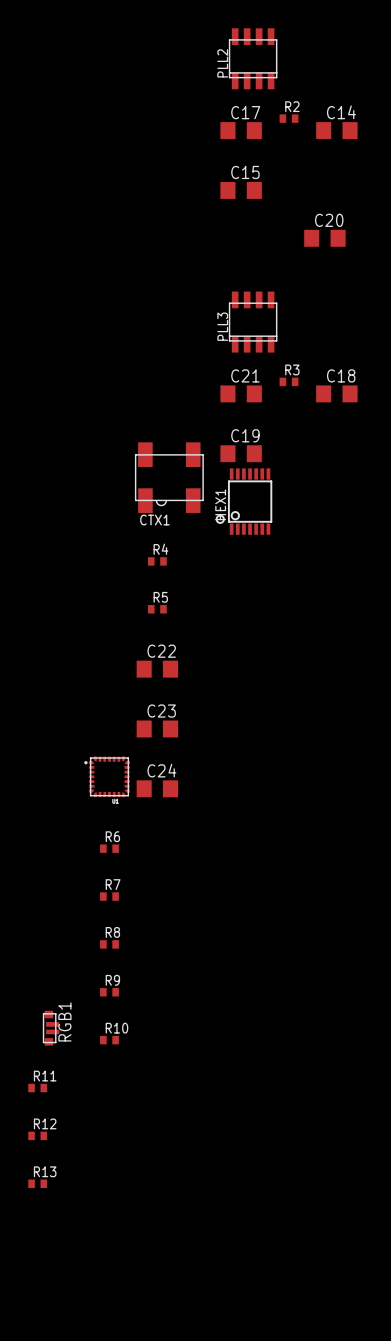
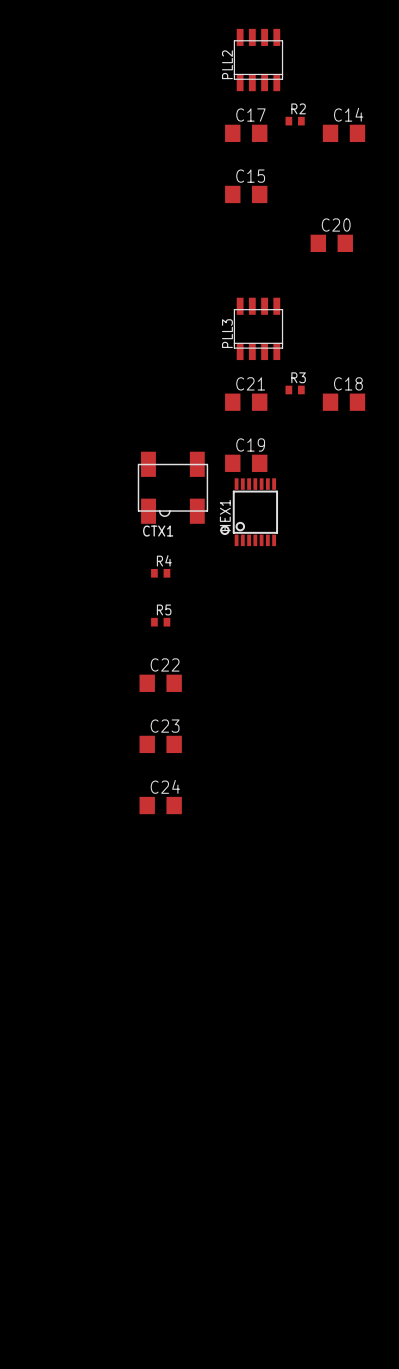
part: (107, 776) -> none
R6: (109, 848) -> none
R7: (109, 896) -> none
R8: (109, 944) -> none
R9: (109, 992) -> none
RGB1: (51, 1028) -> none
R10: (109, 1040) -> none
R11: (37, 1088) -> none
R12: (37, 1135) -> none
R13: (37, 1183) -> none

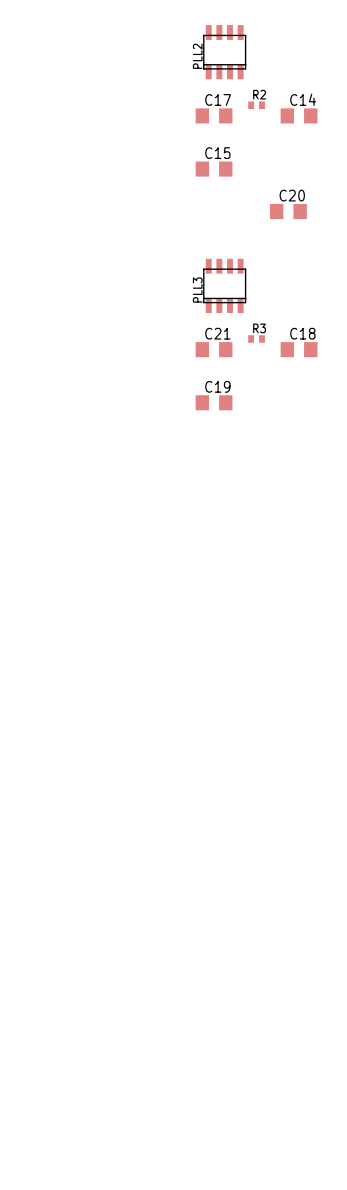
CTX1: (172, 487) -> none
HEX1: (249, 512) -> none
R4: (160, 573) -> none
R5: (160, 622) -> none
C22: (160, 683) -> none
C23: (160, 744) -> none
C24: (160, 805) -> none

